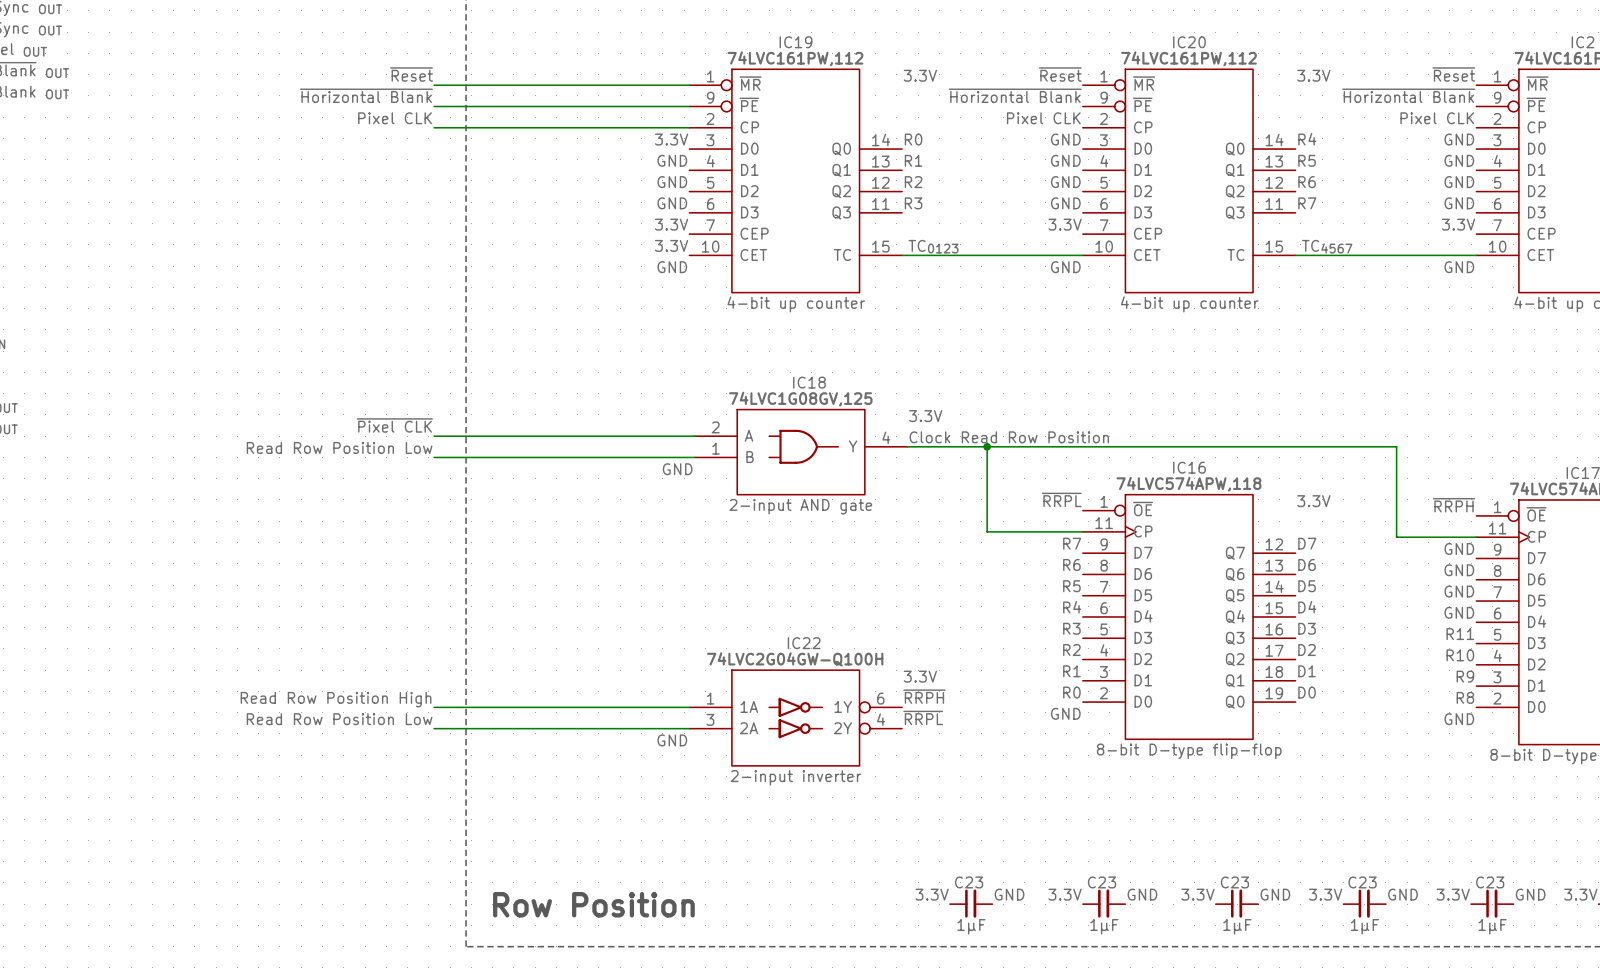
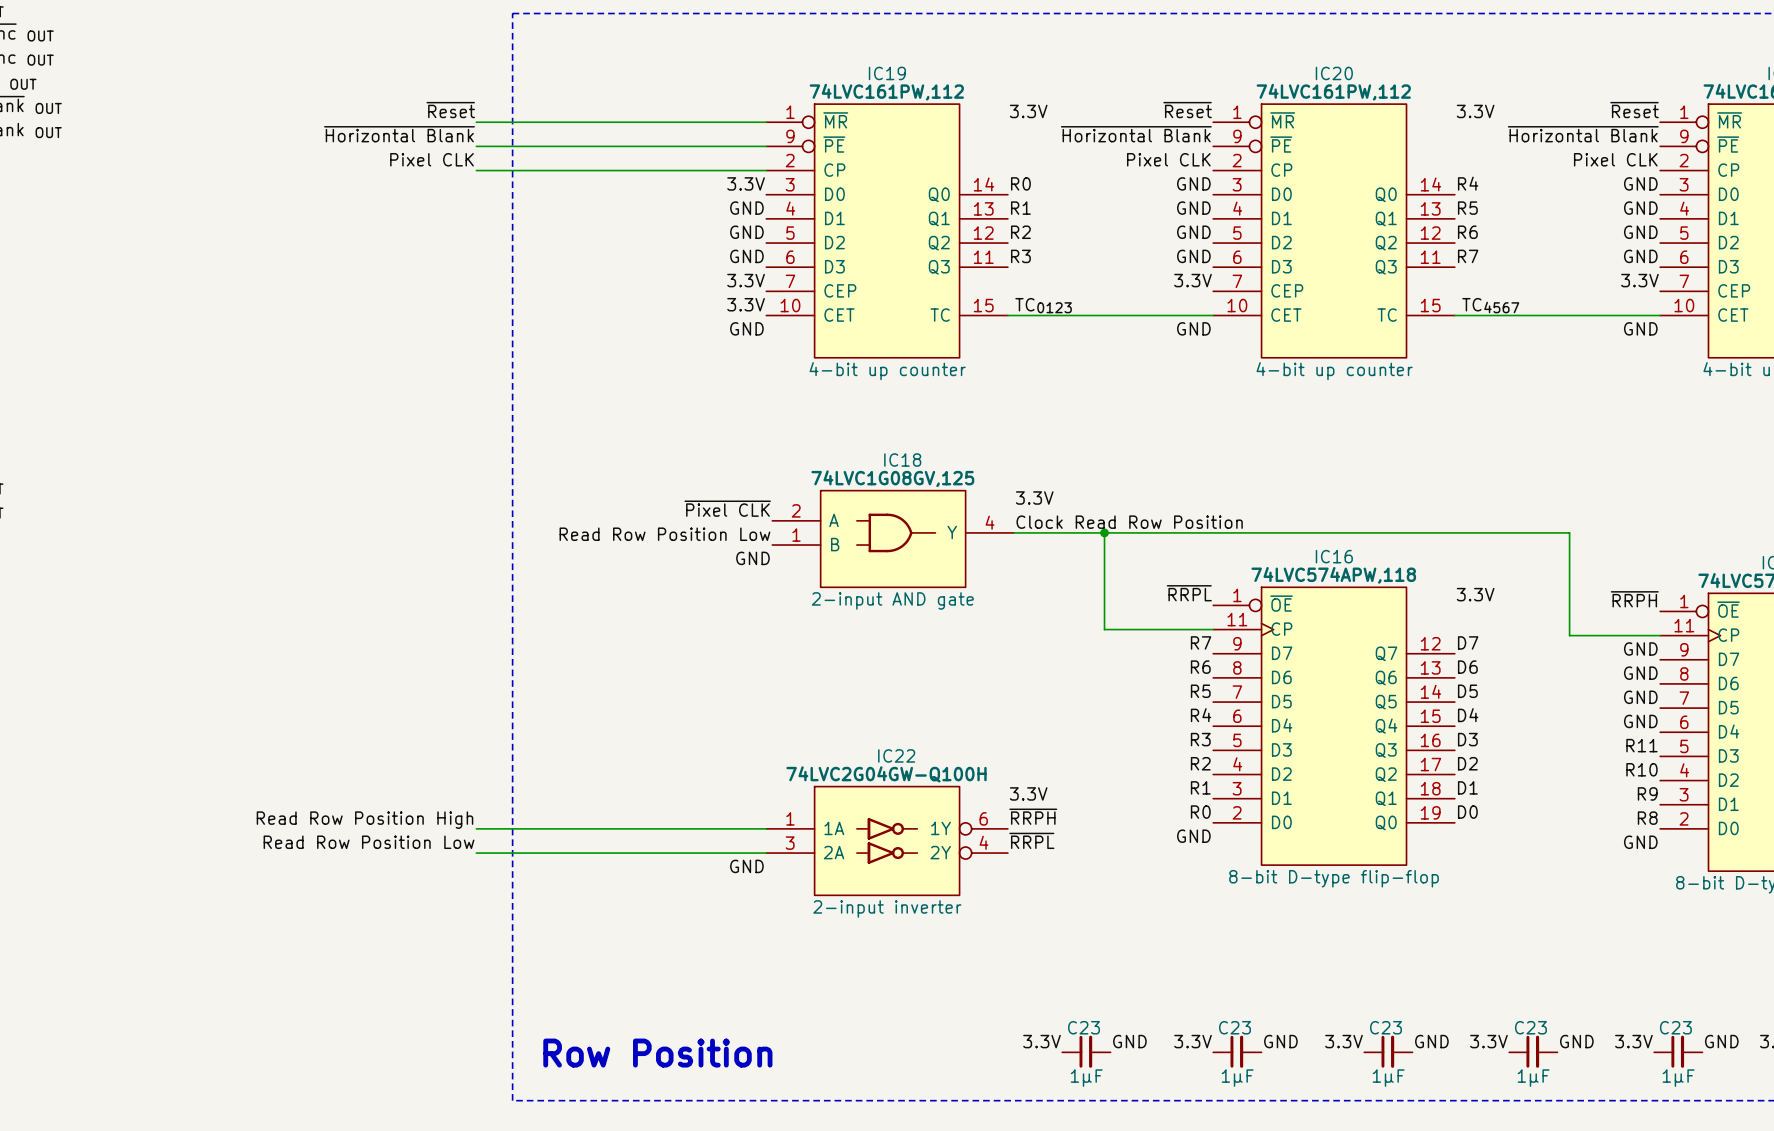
label: ~{Pixel CLK} (394, 425) -> none
label: none -> ~{Pixel CLK} (727, 508)
wire: (434, 436) (694, 436) -> none
label: Read Row Position Low (339, 447) -> none
label: none -> Read Row Position Low (664, 534)
wire: (434, 457) (694, 457) -> none

